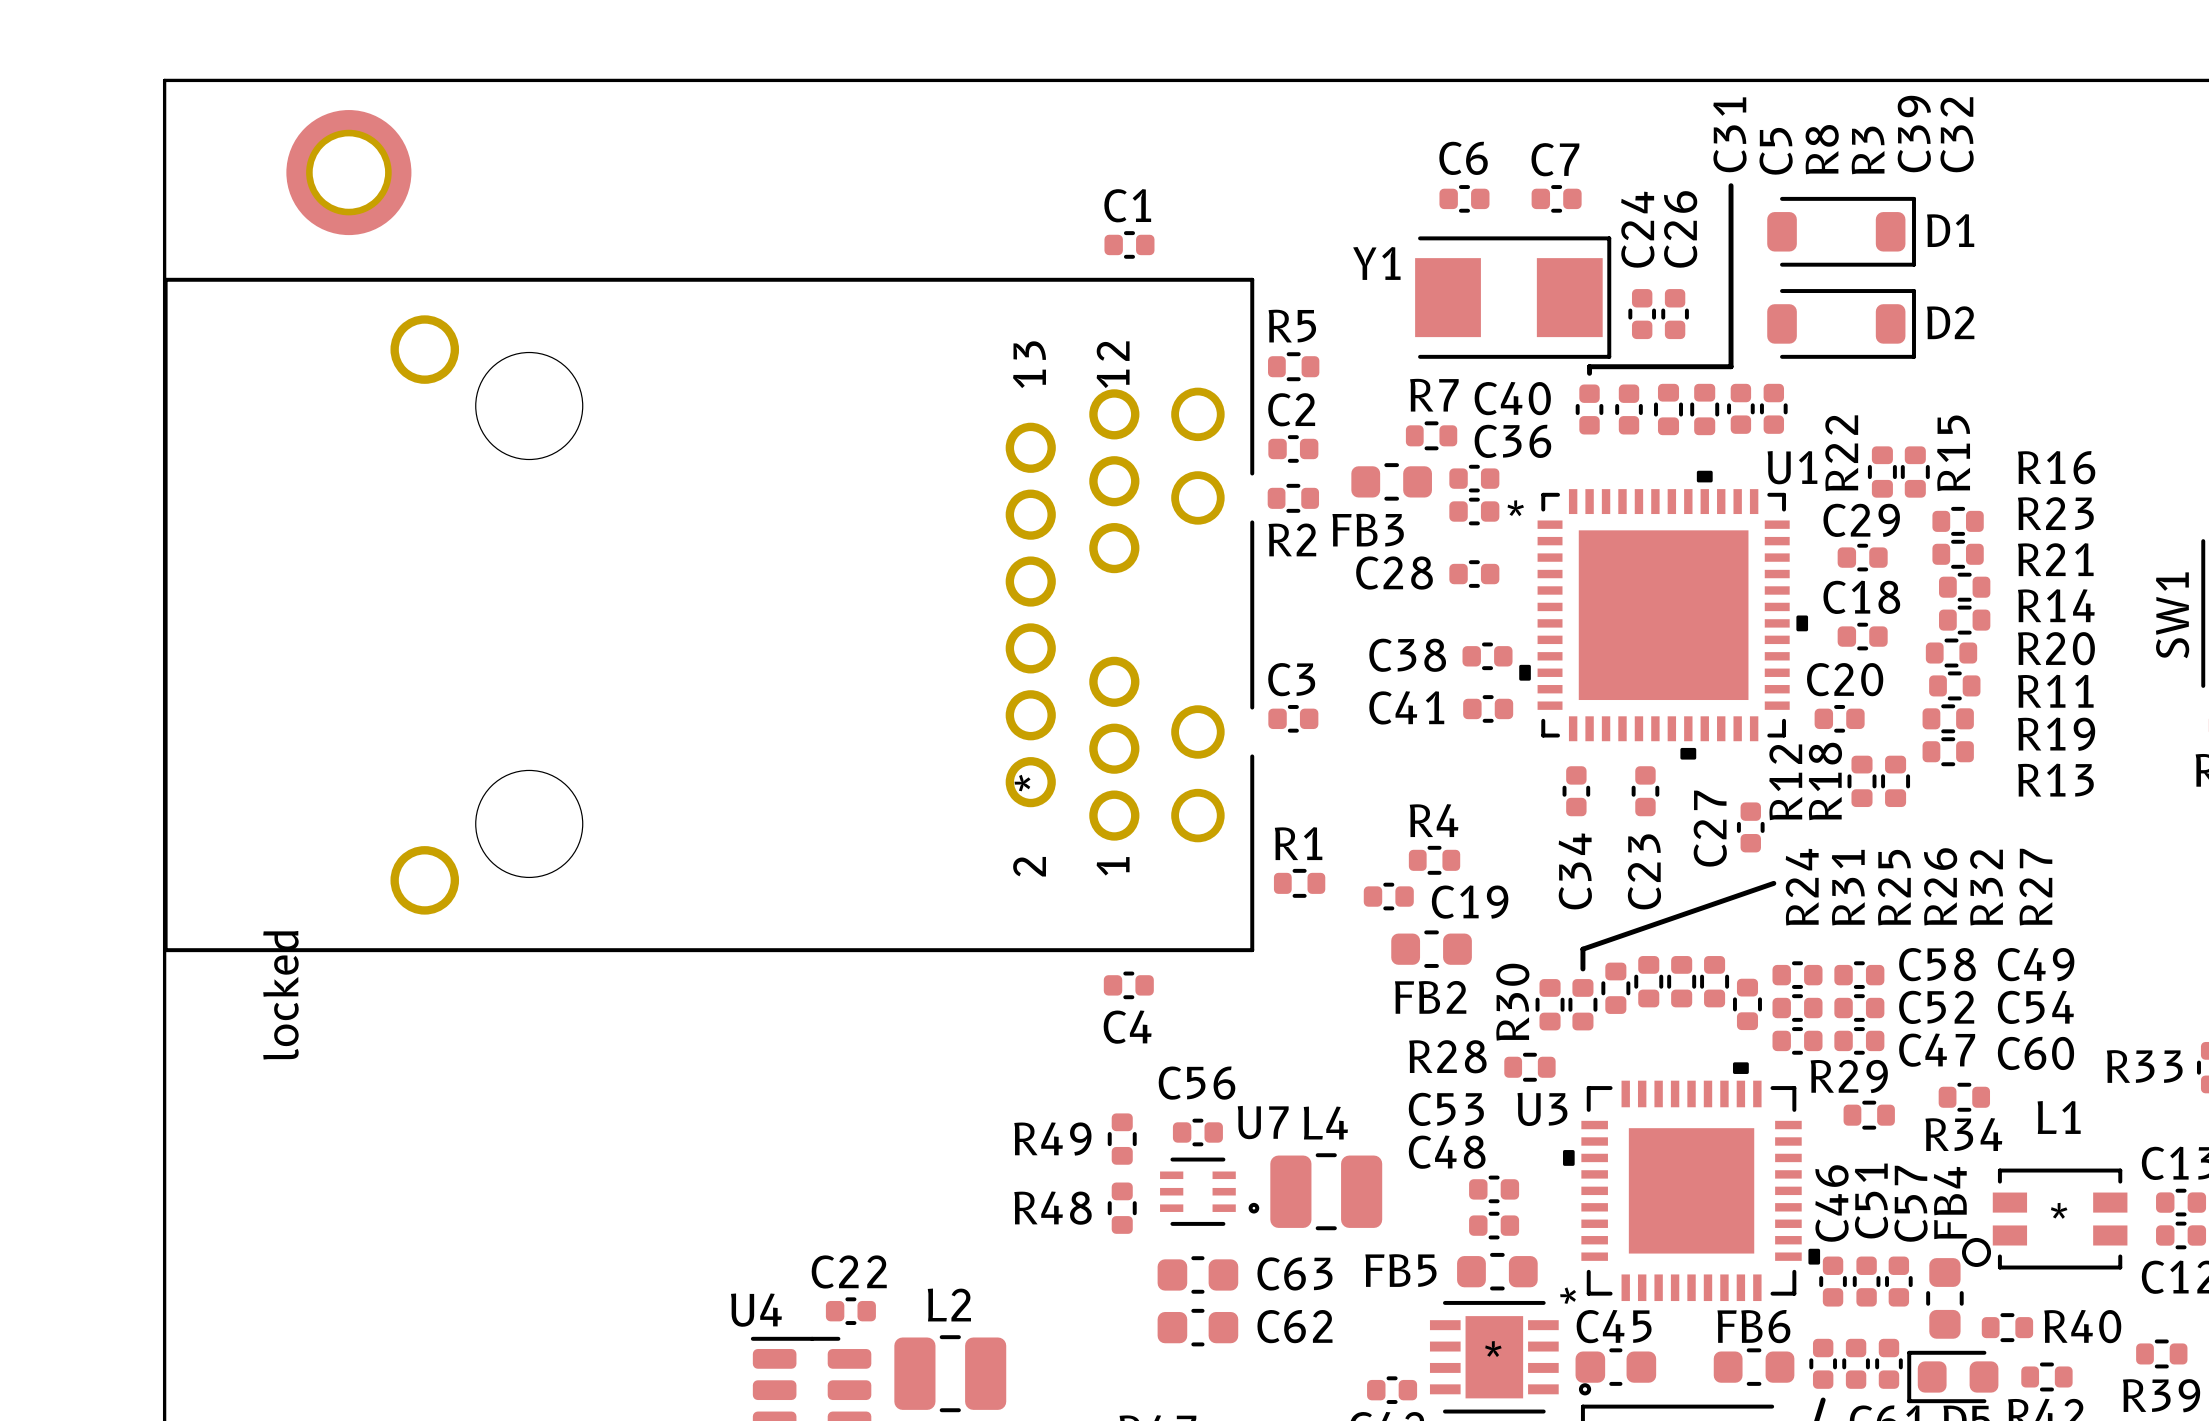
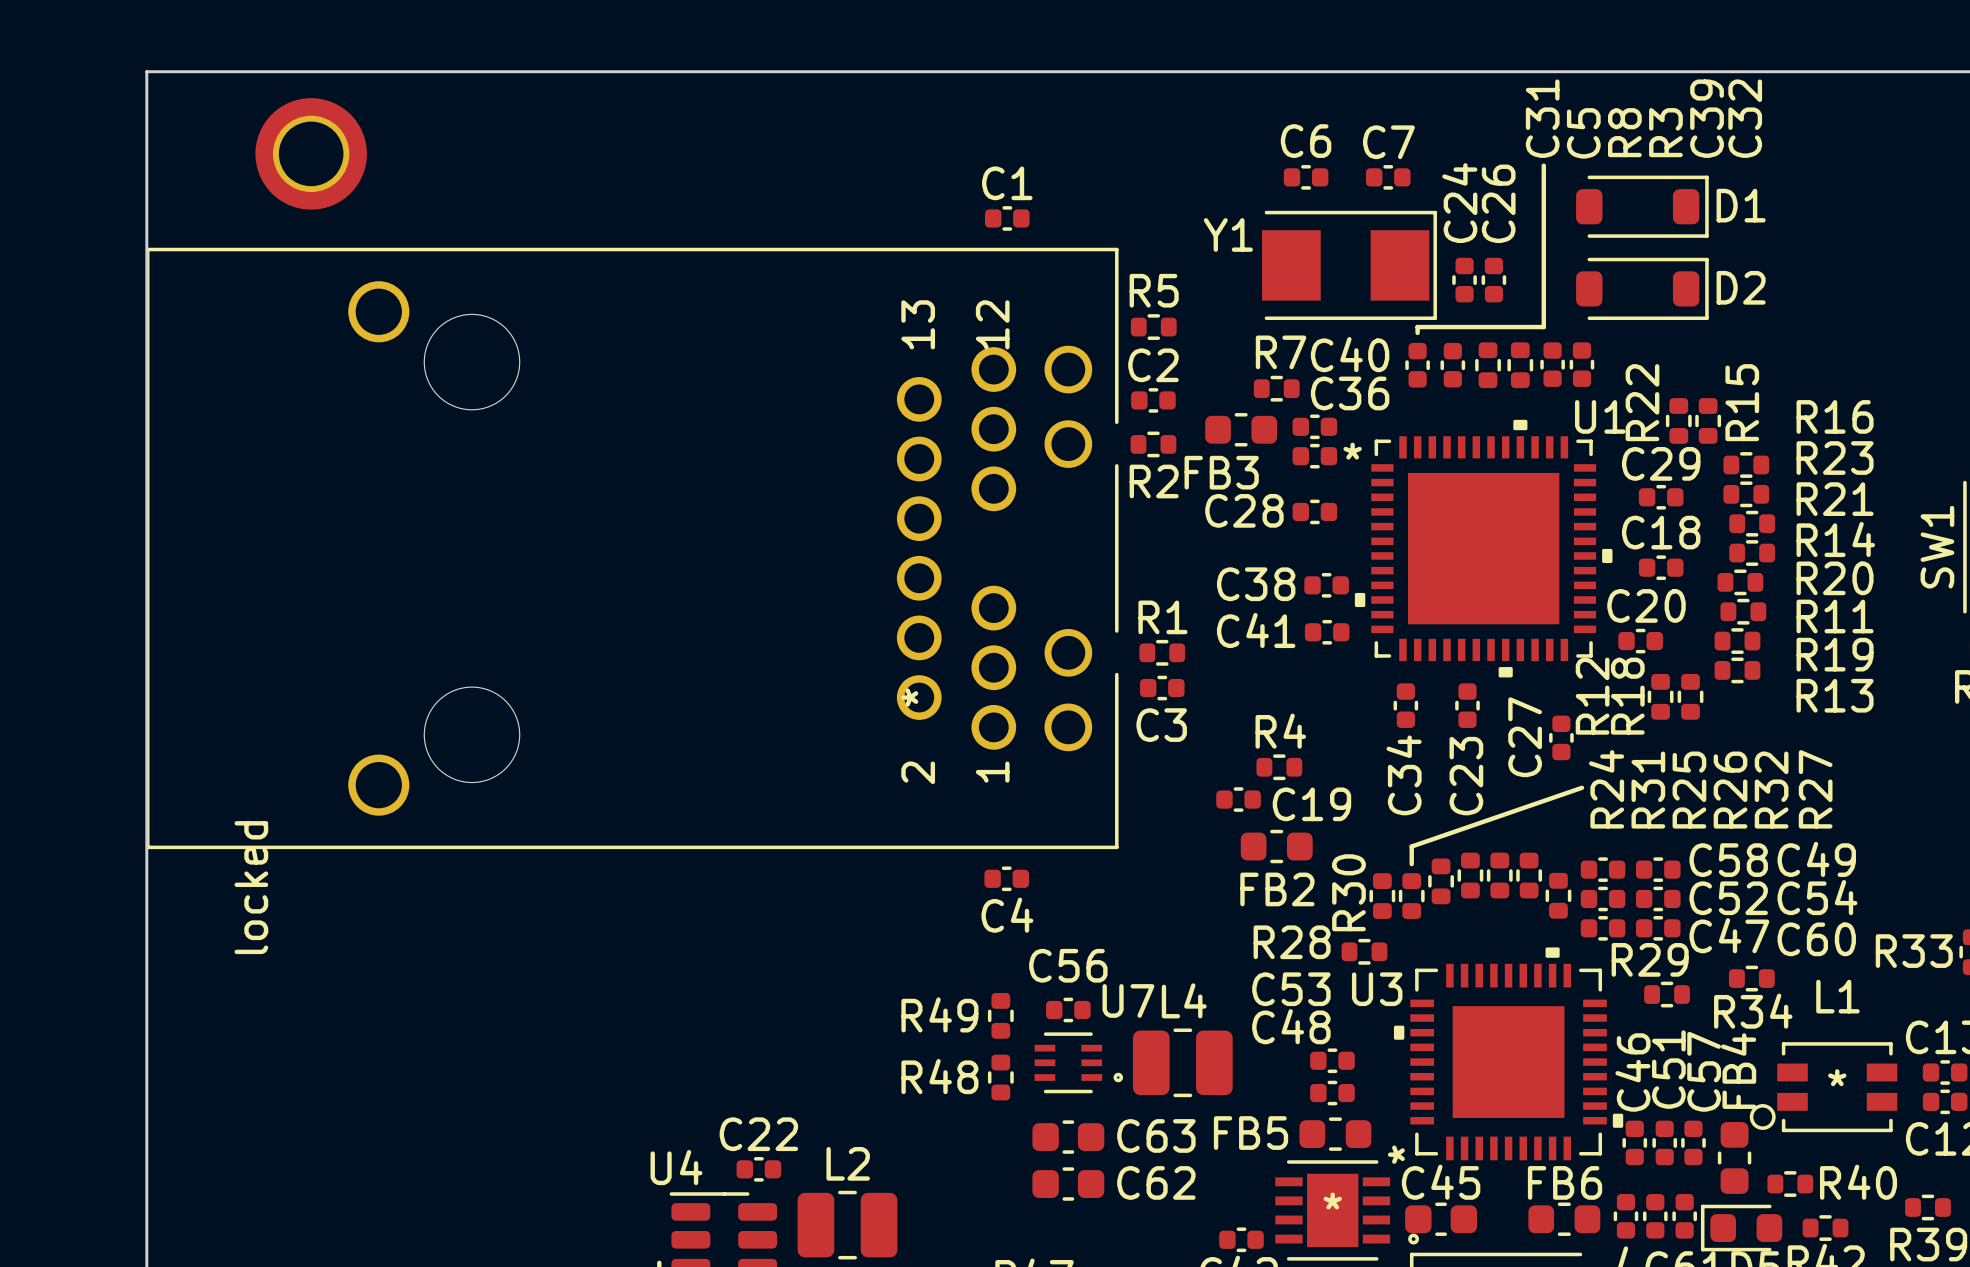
C3 name position: C3 (1291, 679) -> C3 (1161, 725)
C3 position: (1293, 718) -> (1162, 688)
R1 position: (1299, 883) -> (1162, 652)

